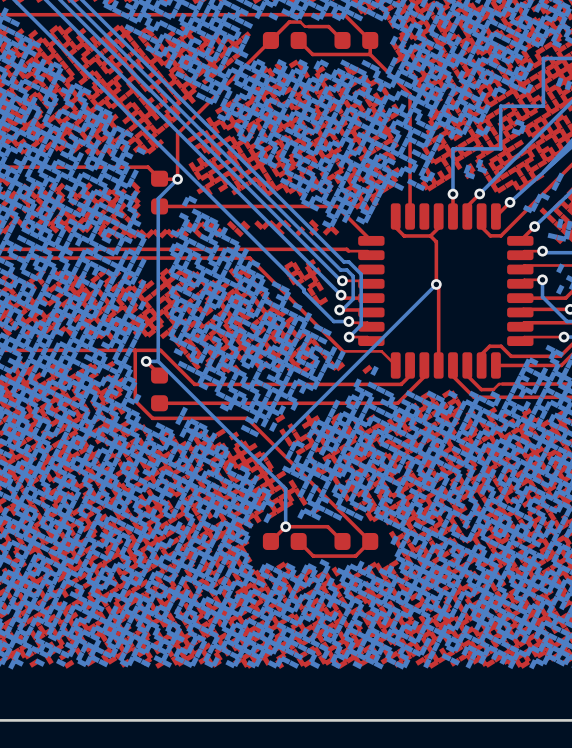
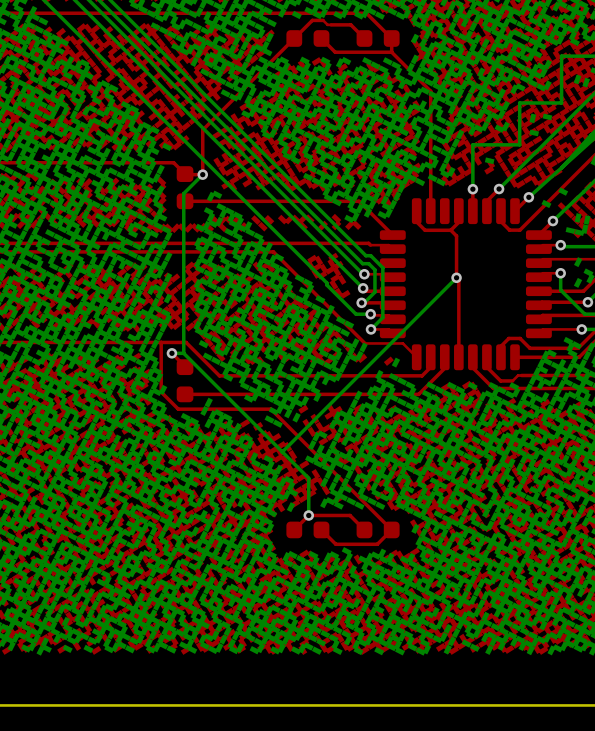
drawing: none -> [529, 113, 553, 124]
drawing: [514, 119, 527, 135] -> none
drawing shape: [511, 128, 522, 136] -> [529, 129, 540, 137]
drawing: [465, 158, 488, 180] -> none
drawing shape: [463, 164, 472, 175] -> [484, 157, 495, 165]
drawing: [530, 172, 565, 213] -> none

